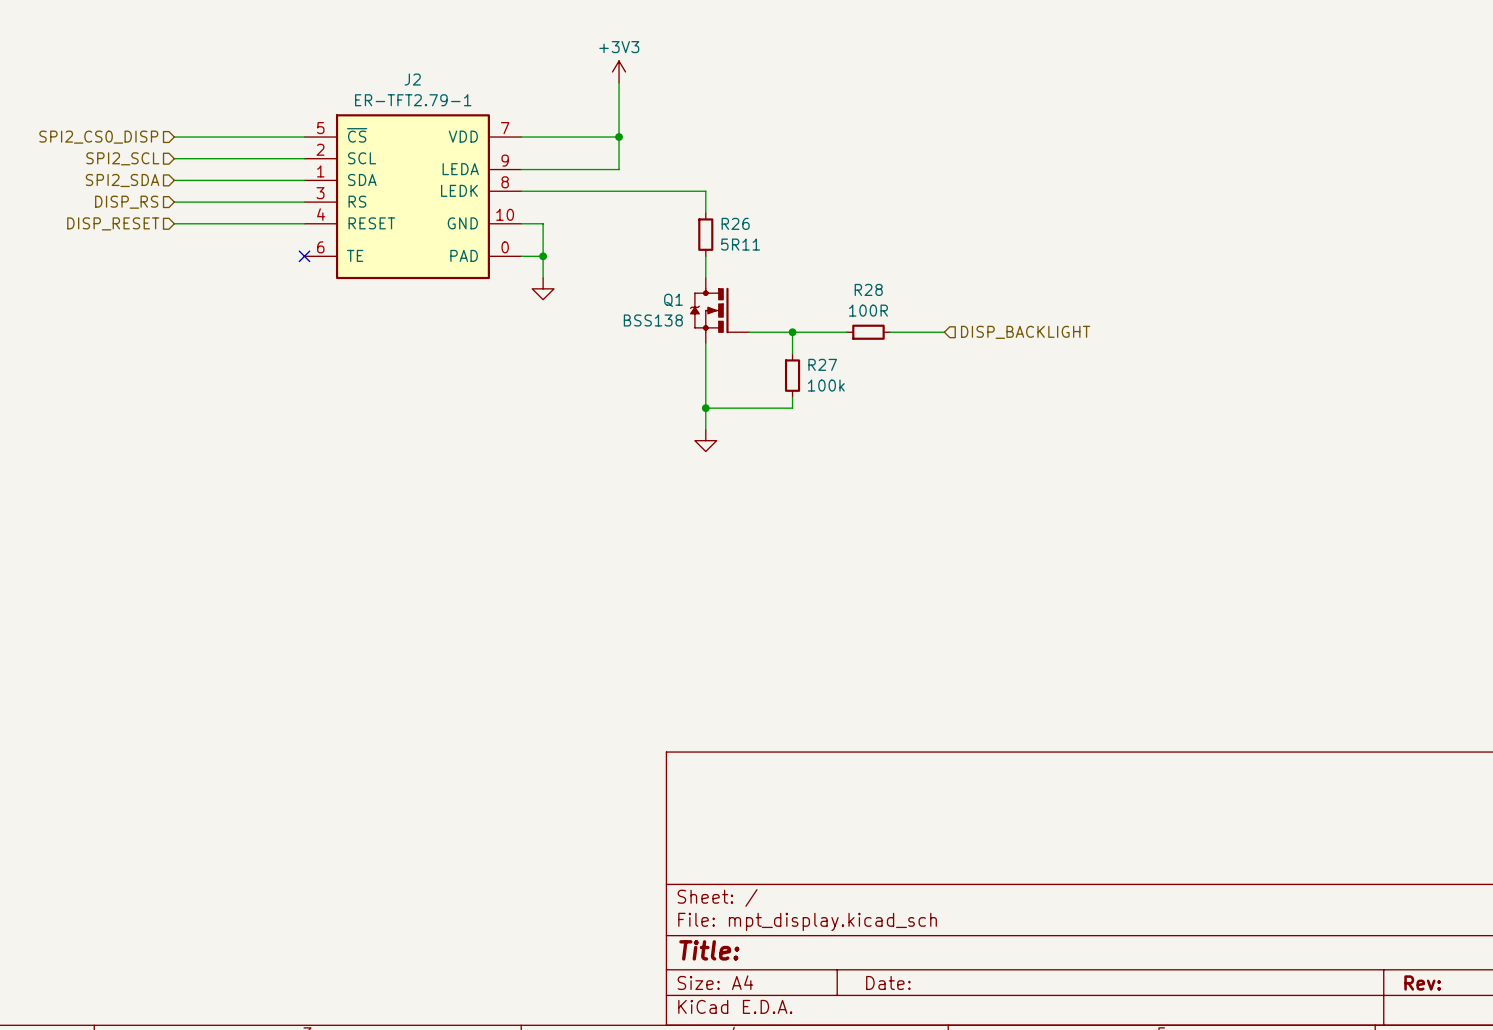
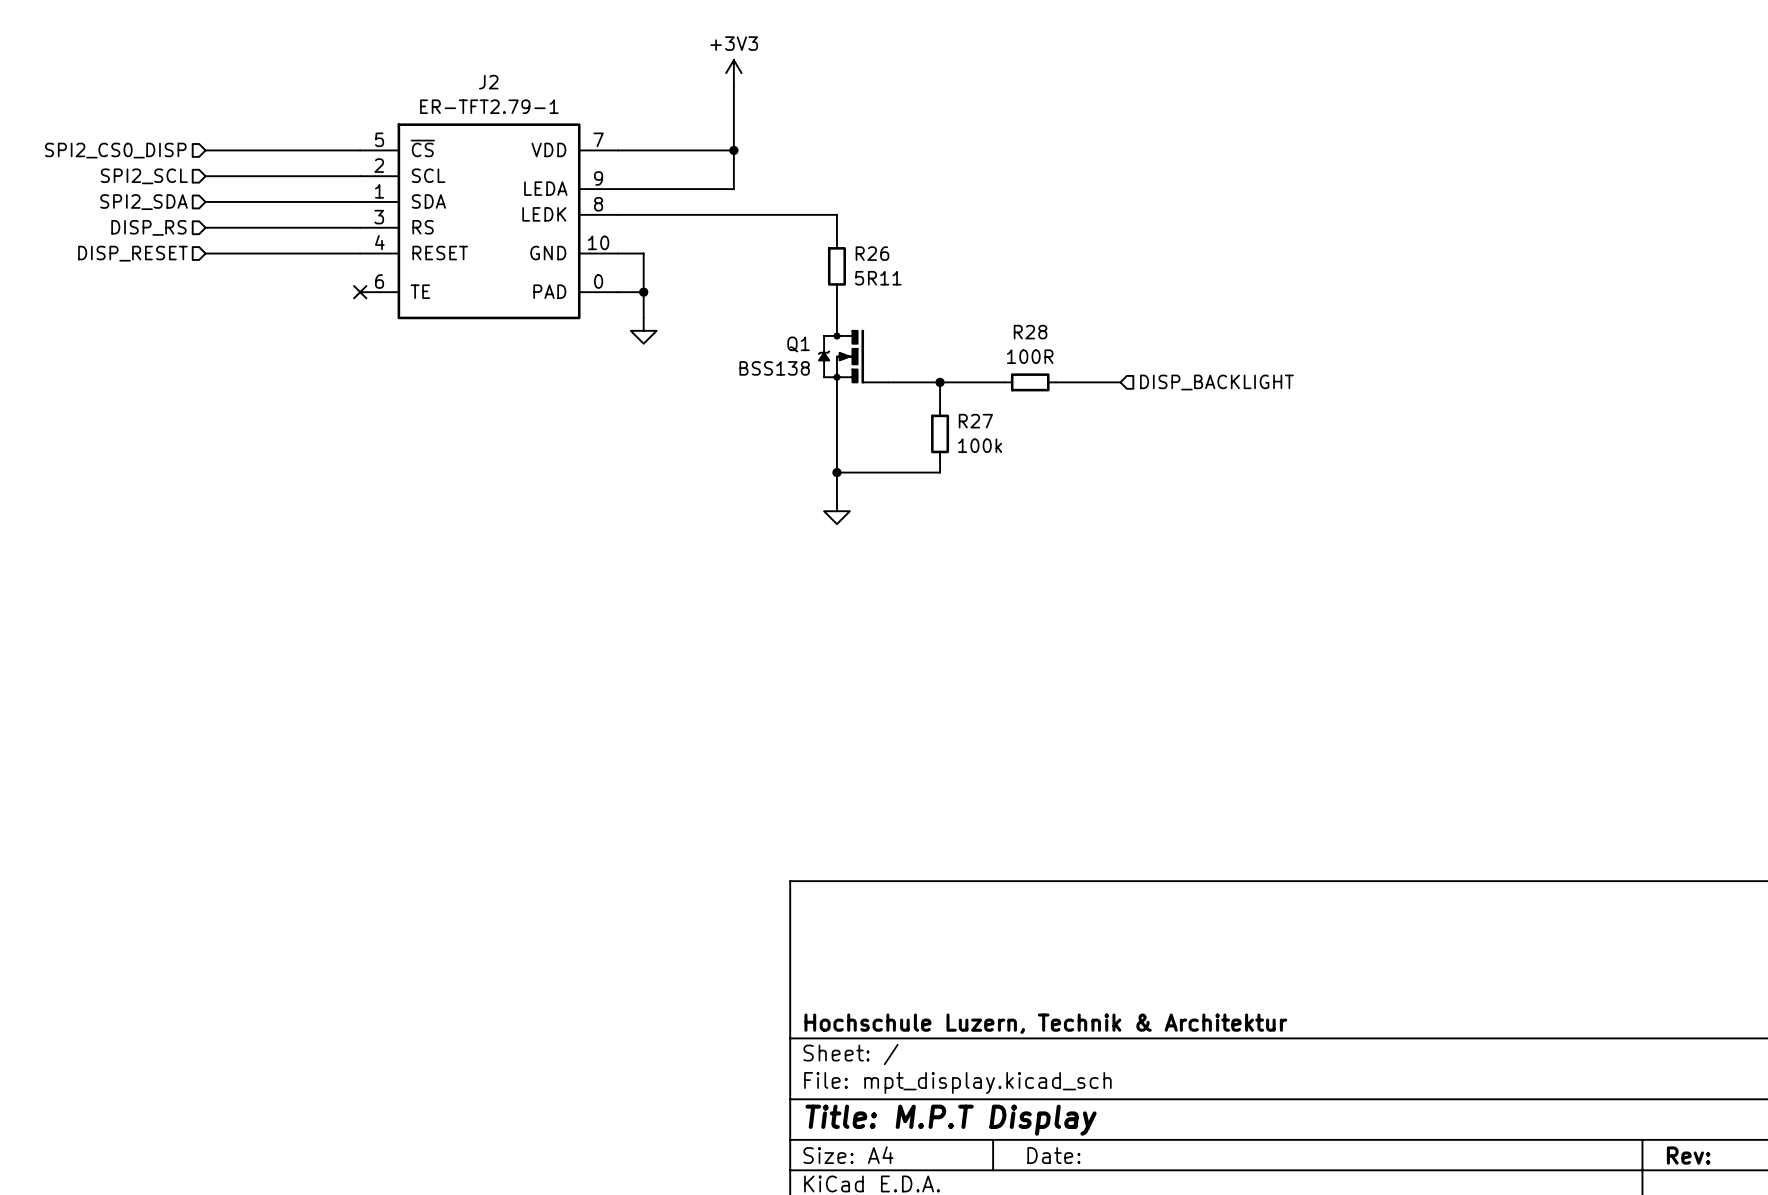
title block: none -> Hochschule Luzern, Technik & Architektur (1045, 1023)
title block: Title: (709, 950) -> Title: M.P.T Display (951, 1120)

